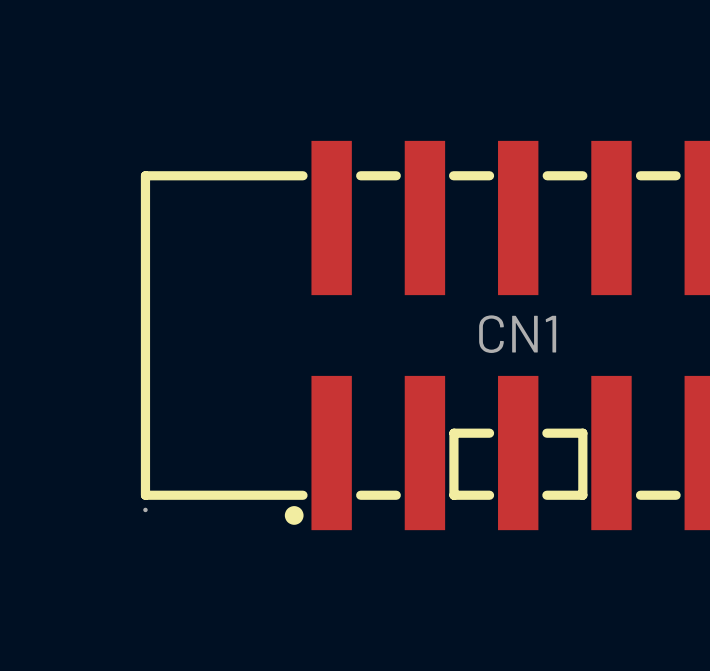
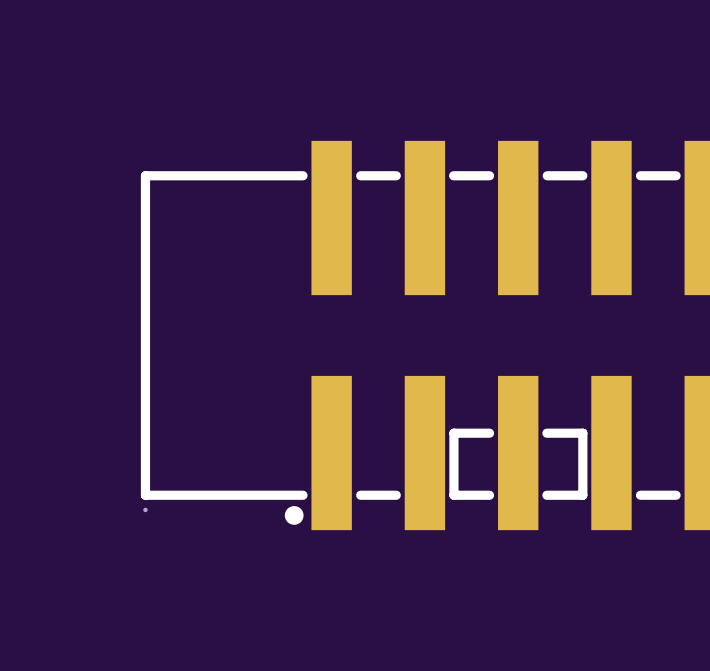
CN1 name: CN1 (517, 334) -> none

